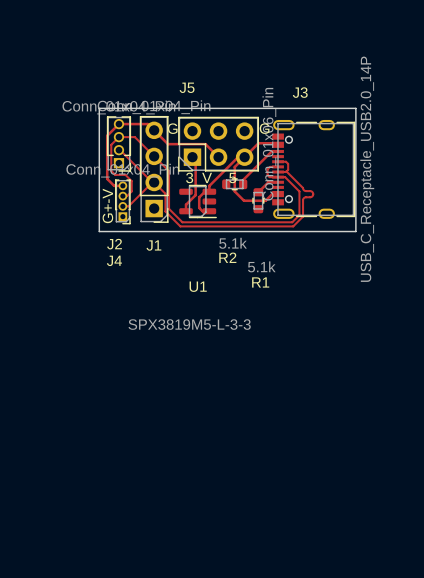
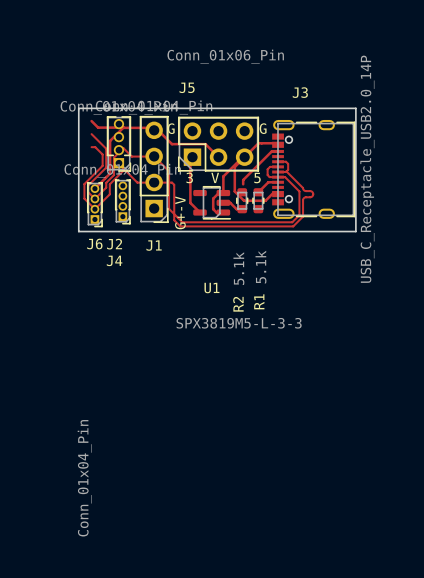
board edge: (99, 108) (99, 231) -> (99, 108) (78, 108) (78, 231) (99, 231)
top track: none -> (91, 121) (98, 127) (123, 127)
top track: none -> (123, 127) (110, 140) (110, 173) (94, 188)
top track: (171, 144) (167, 144) (147, 124) (118, 124) (107, 135) (107, 178) (114, 185) (122, 185) -> (171, 144) (155, 127) (123, 127)
J5 value rotation: 0° (269, 144) -> 90° clockwise (225, 56)
top track: (118, 150) (152, 182) -> none
top track: none -> (196, 156) (190, 162) (190, 202) (200, 212)
top track: none -> (248, 156) (243, 156) (223, 176) (223, 193) (218, 193) (213, 198) (213, 209) (216, 212) (223, 212)
top track: (192, 157) (195, 160) (195, 195) (186, 204) (186, 211) -> none
top track: (244, 157) (238, 157) (209, 185) (209, 191) (204, 191) (199, 197) (199, 207) (202, 211) (209, 211) -> none
top track: (158, 160) (134, 137) (118, 137) (111, 144) (111, 170) (115, 174) (125, 174) (131, 181) (131, 191) (127, 196) (122, 196) -> (158, 160) (158, 156) (131, 156) (123, 148) (113, 157) (113, 175) (106, 182) (106, 187) (94, 198) (88, 192) (88, 185) (106, 167) (106, 148) (91, 134)
top track: (152, 182) (165, 193) (165, 211) (174, 220) -> (91, 147) (95, 147) (102, 154) (102, 165) (84, 184) (84, 198) (94, 209) (109, 194) (109, 184) (123, 168) (137, 182) (172, 182) (174, 184) (174, 220)
top track: (152, 182) (128, 206) (122, 206) -> none
R2 rotation: 0° (234, 184) -> 90° clockwise (242, 200)
R2 position: (234, 184) -> (242, 200)
U1 position: (198, 201) -> (212, 202)
top track: none -> (223, 202) (230, 202) (236, 209) (242, 209)
J6: none -> Conn_01x04_Pin (94, 204)
text position: G+-V (107, 205) -> G+-V (180, 212)
R2 name position: R2 (227, 257) -> R2 (238, 304)
R1 value rotation: 0° (261, 266) -> 90° counterclockwise (260, 267)
R1 name rotation: 0° (260, 282) -> 90° counterclockwise (259, 301)
U1 value position: SPX3819M5-L-3-3 (189, 324) -> SPX3819M5-L-3-3 (239, 323)

